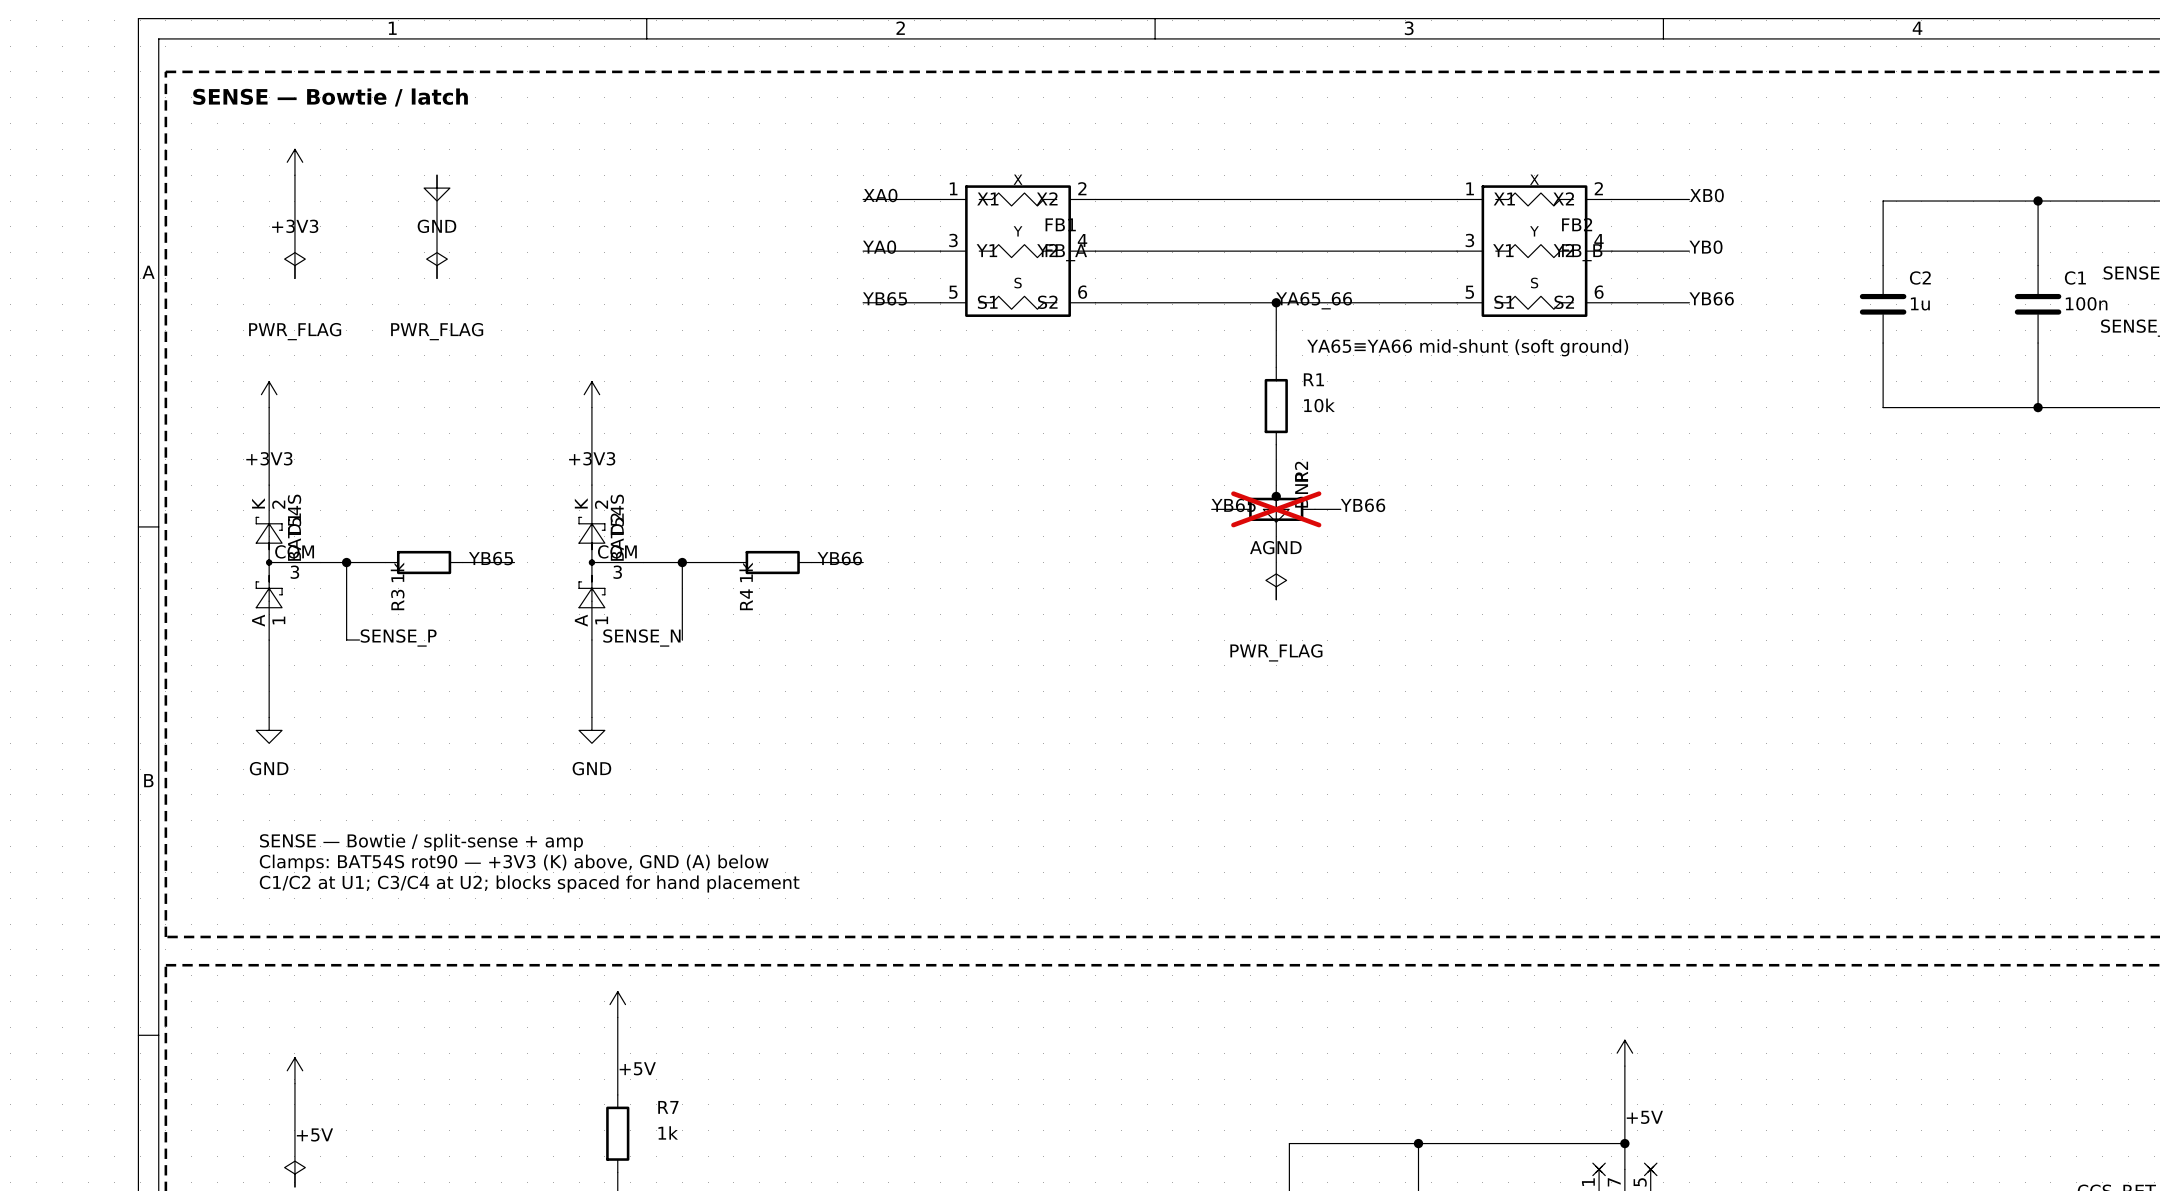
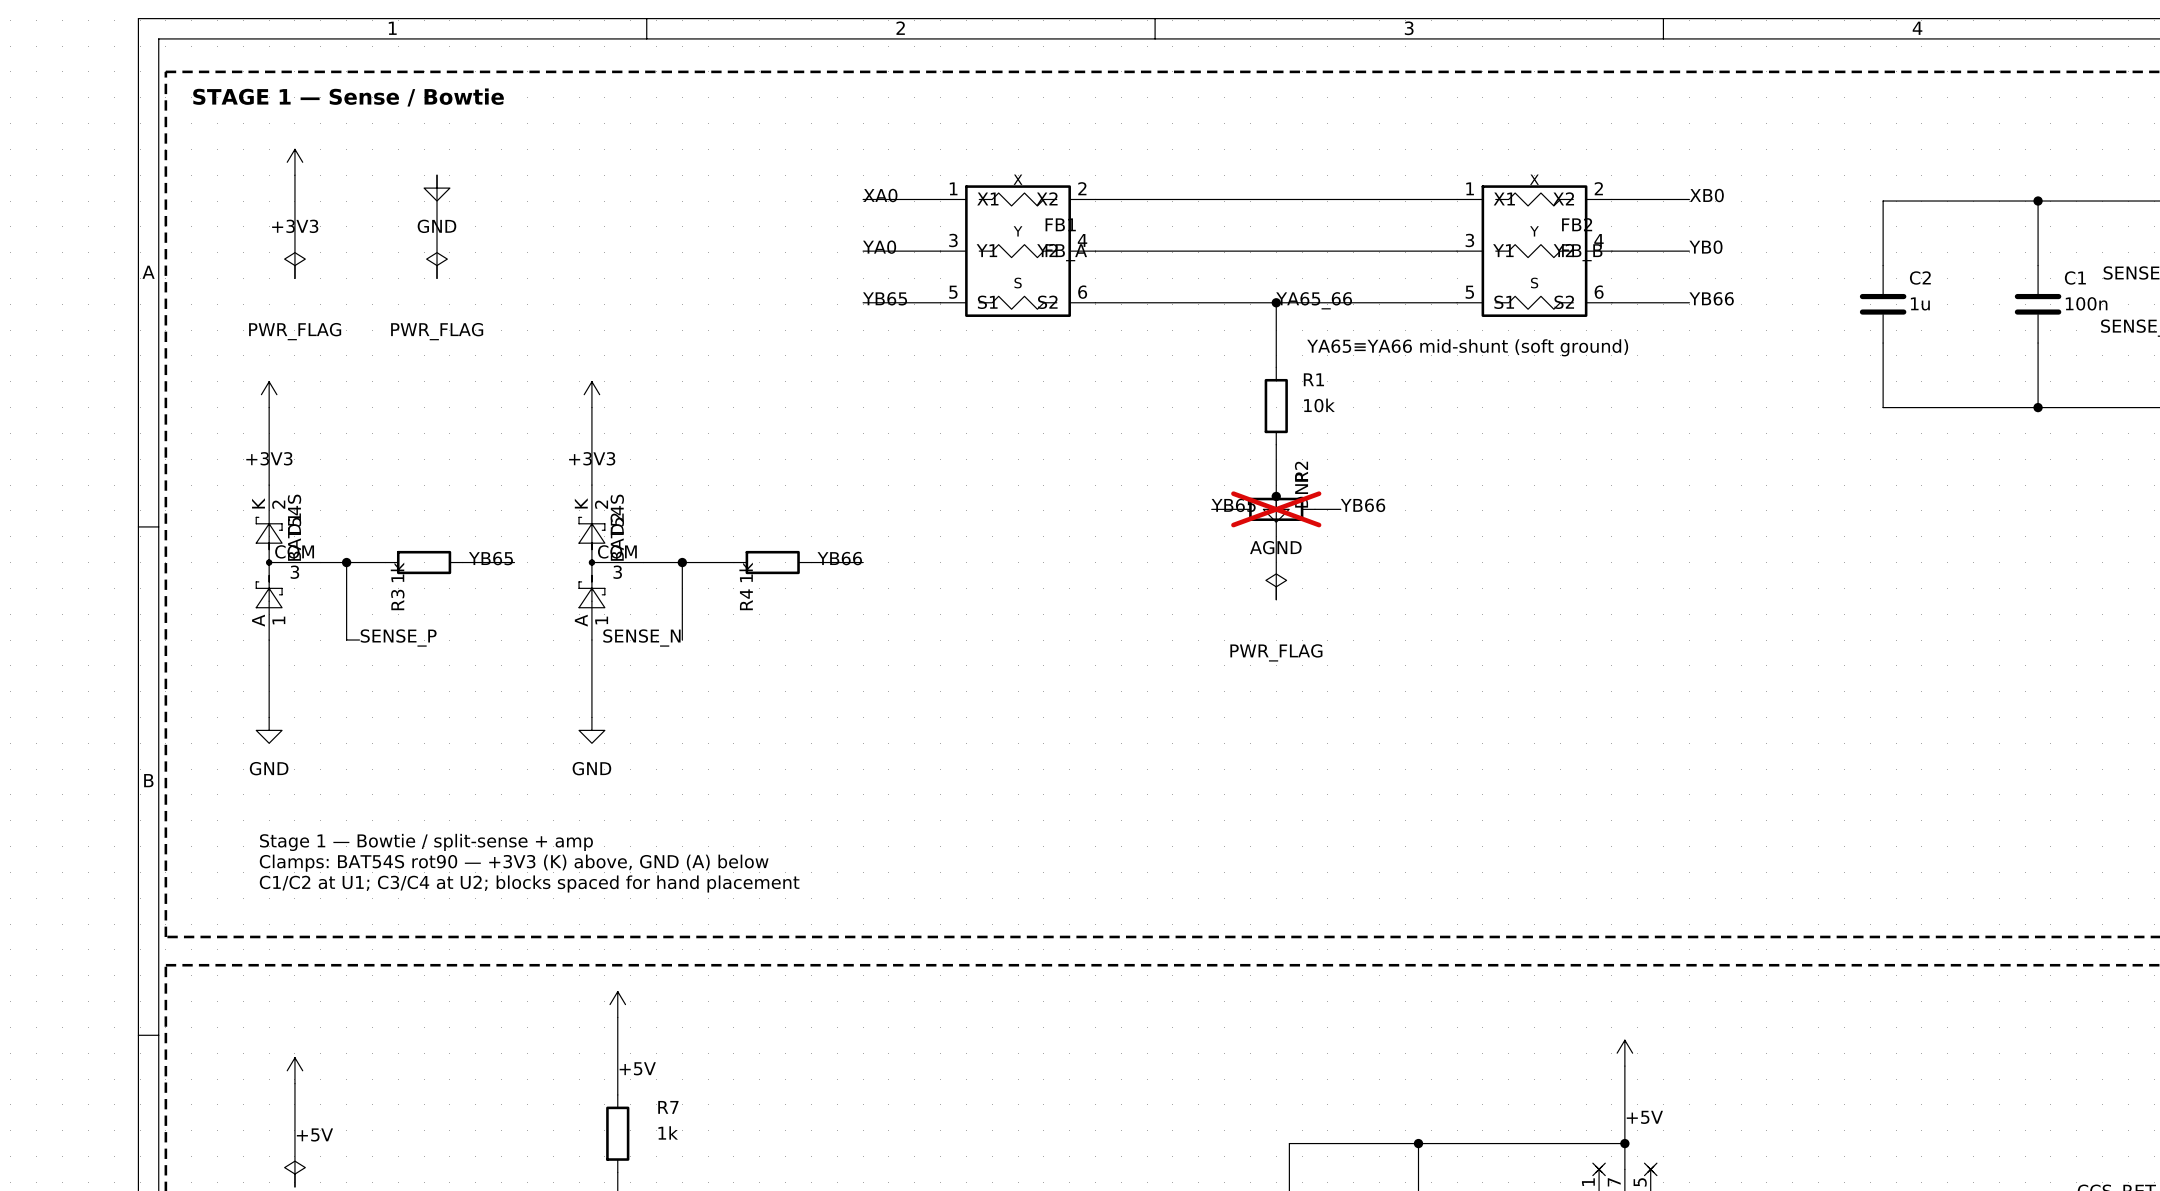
text: SENSE — Bowtie / latch (330, 97) -> STAGE 1 — Sense / Bowtie (348, 97)
text: SENSE — Bowtie / split-sense + amp (421, 842) -> Stage 1 — Bowtie / split-sense + amp (426, 842)

